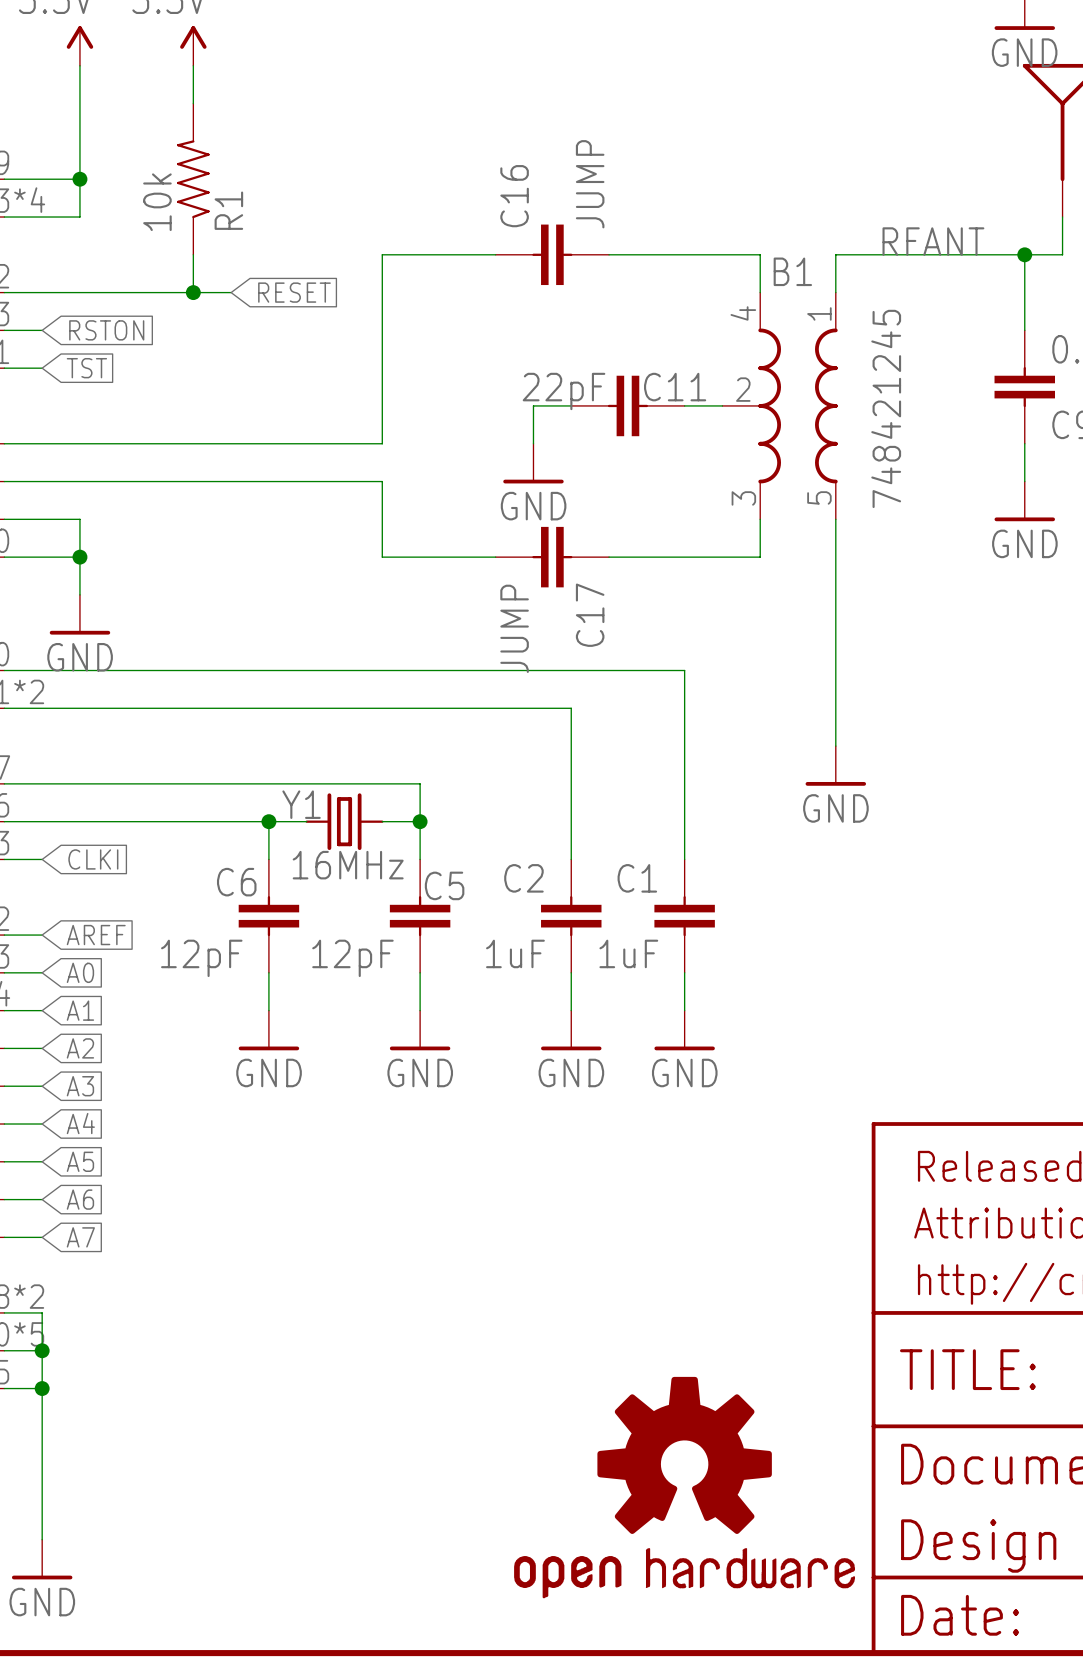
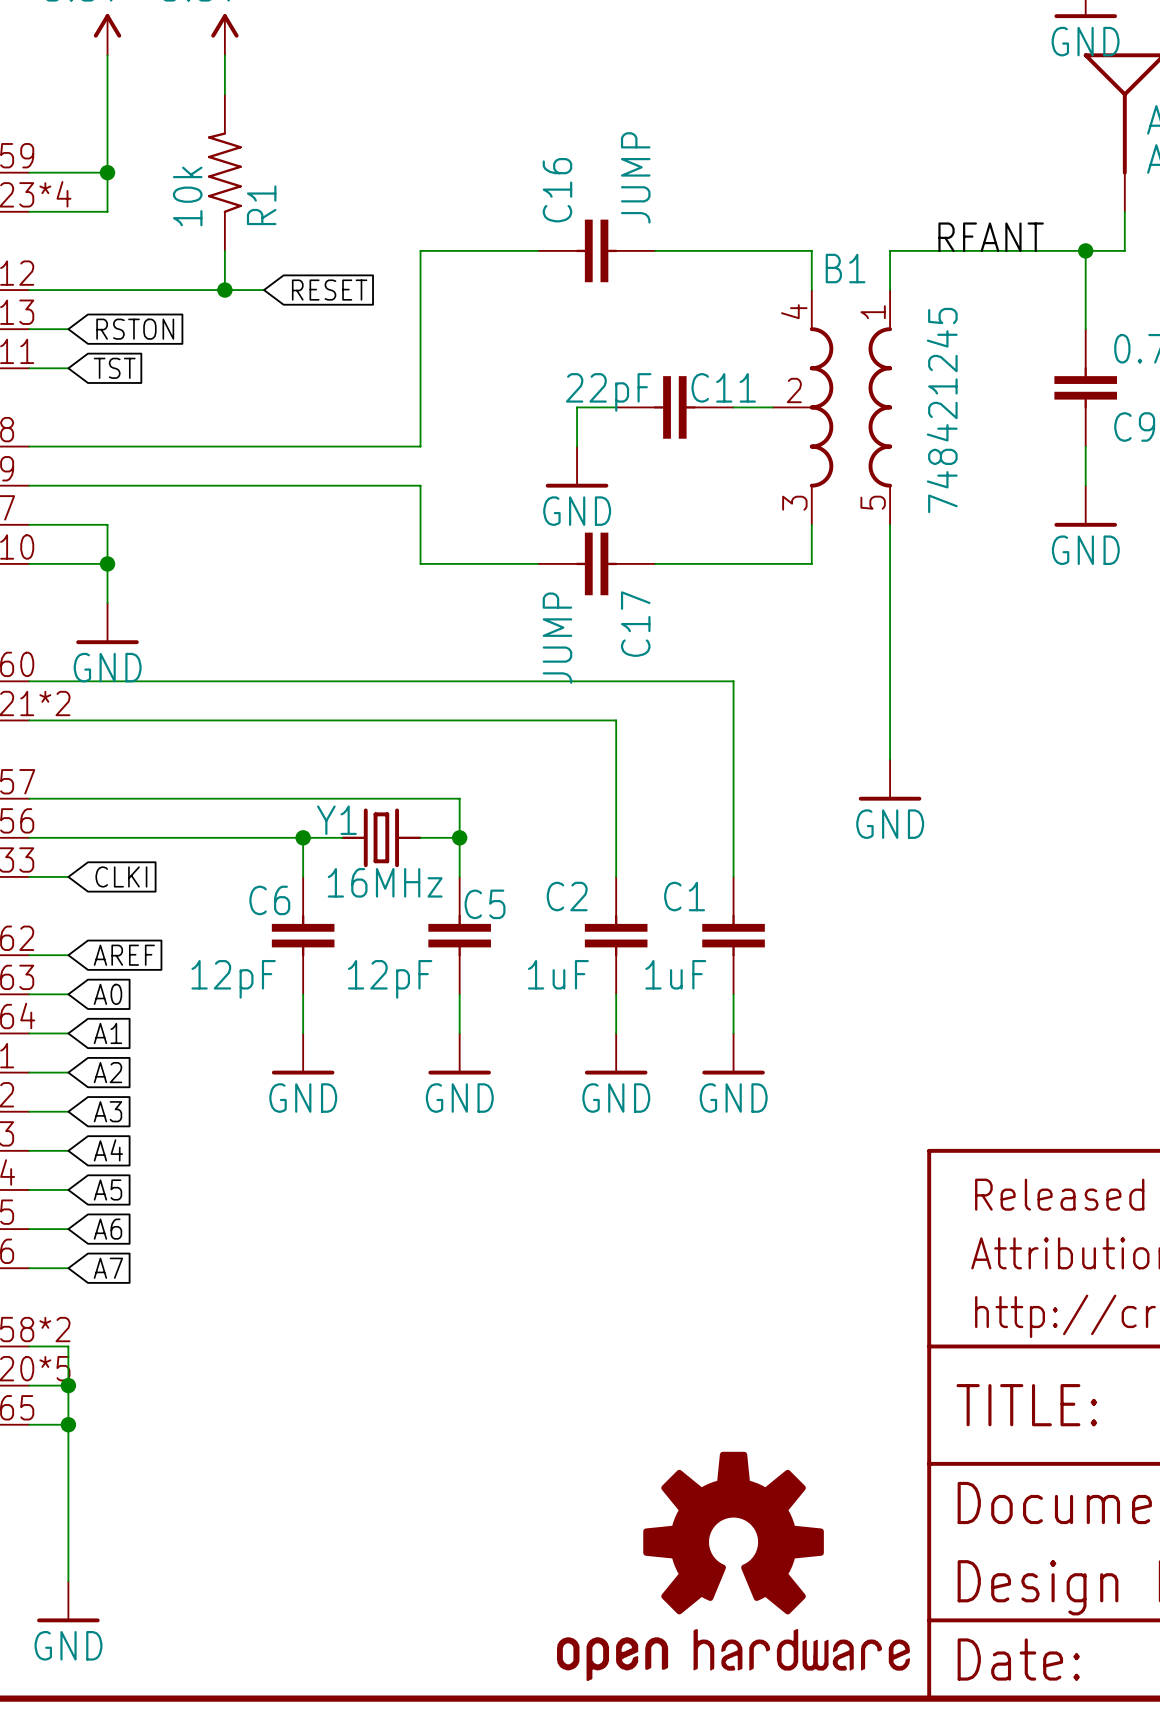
part position: (684, 1487) -> (733, 1566)

